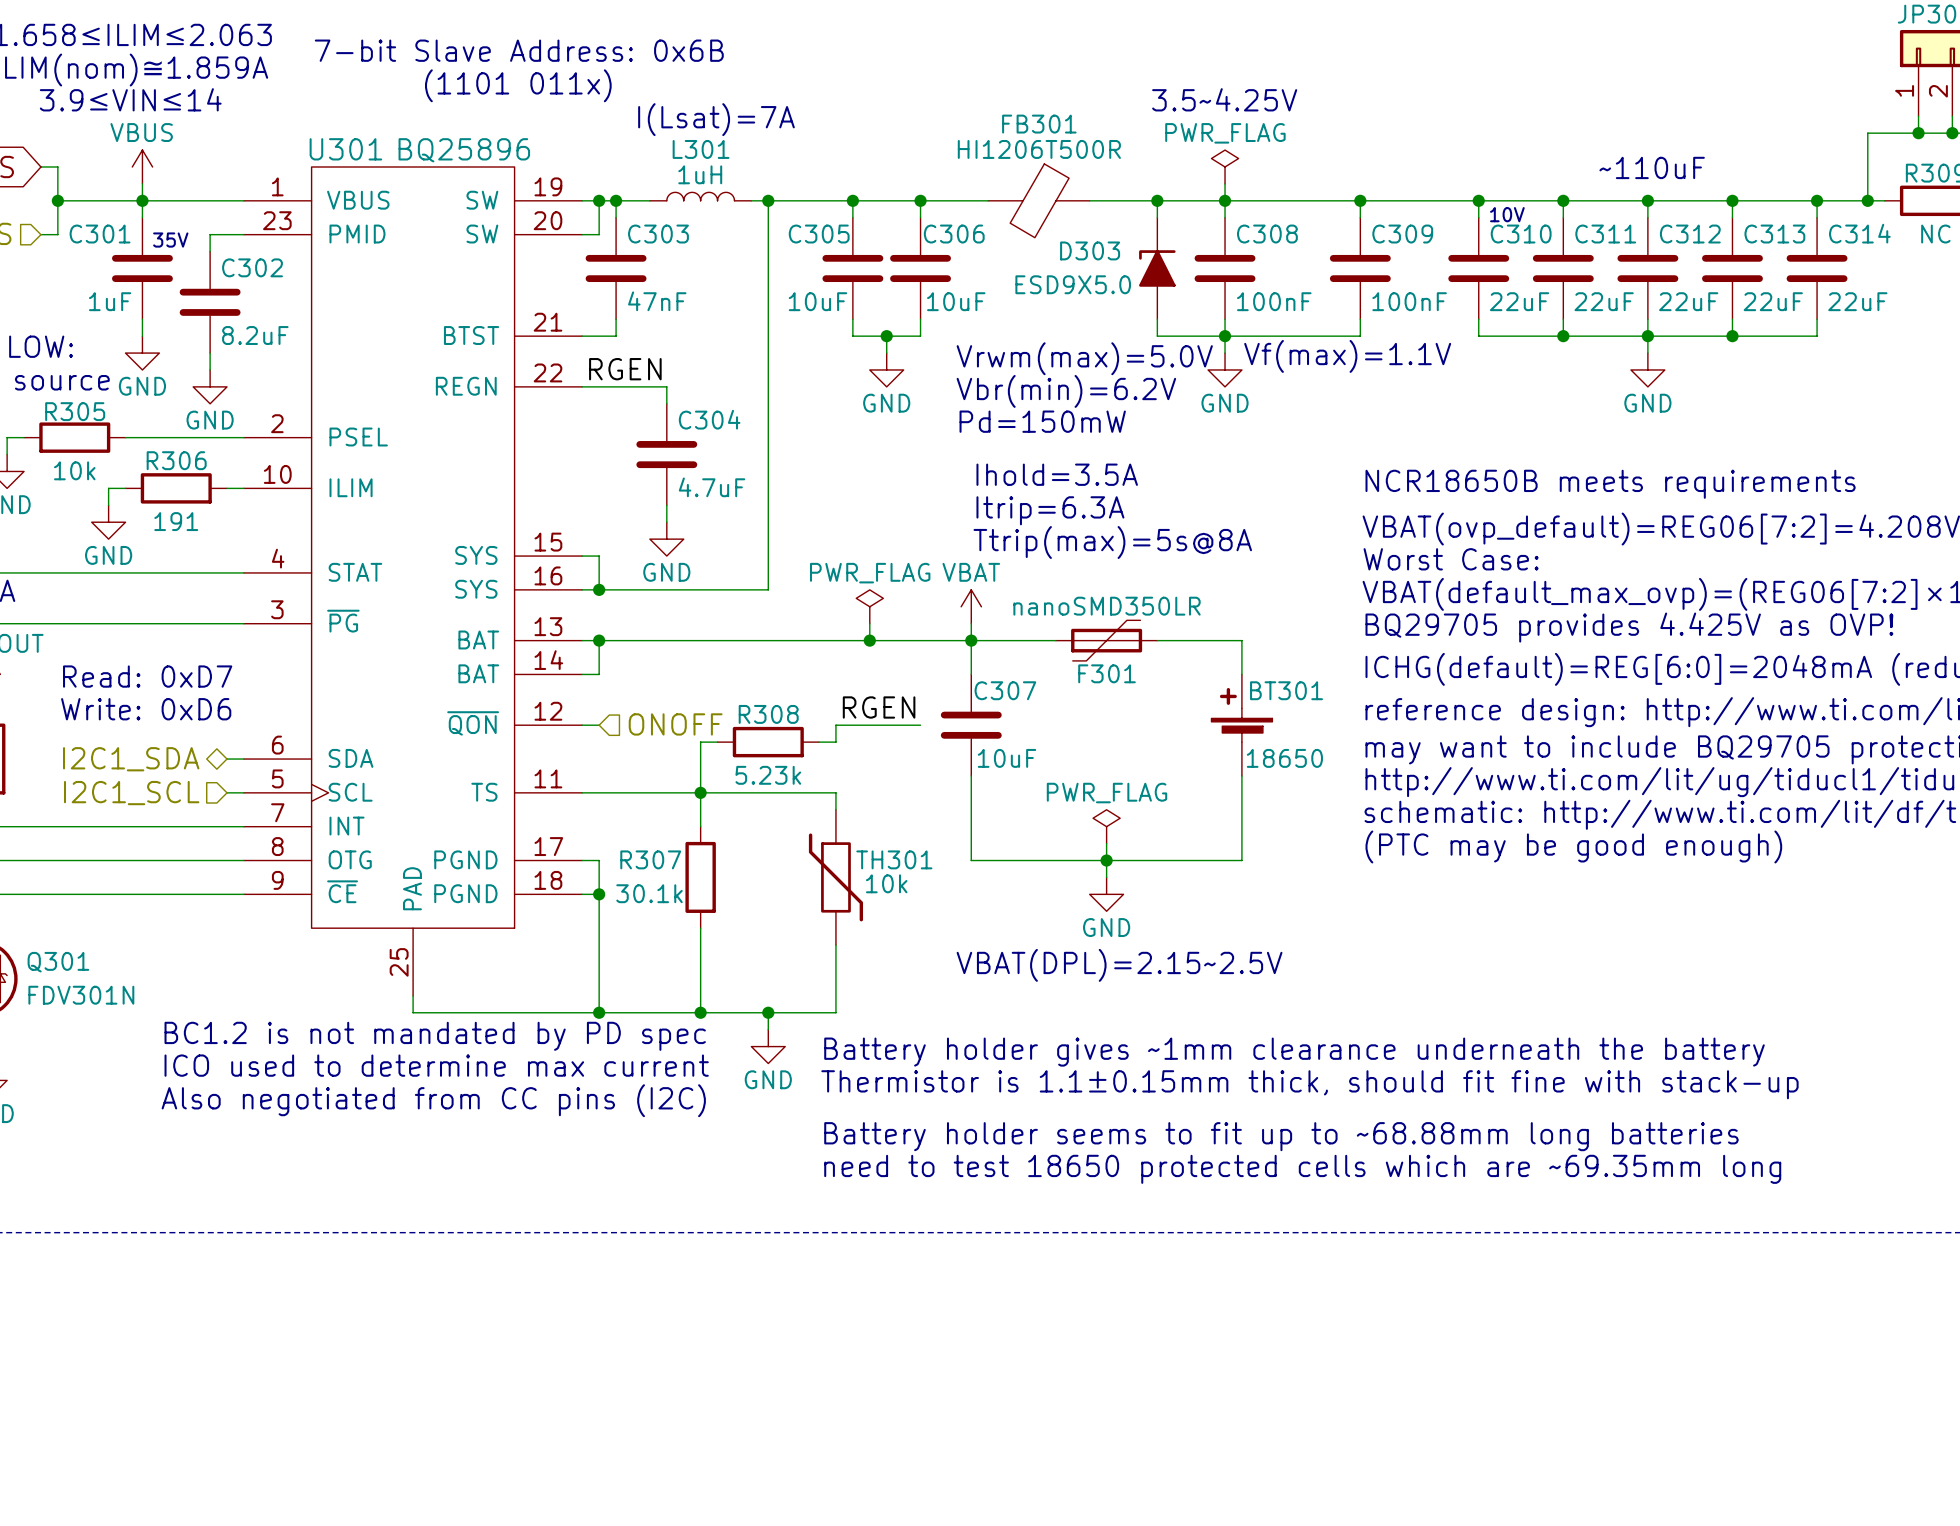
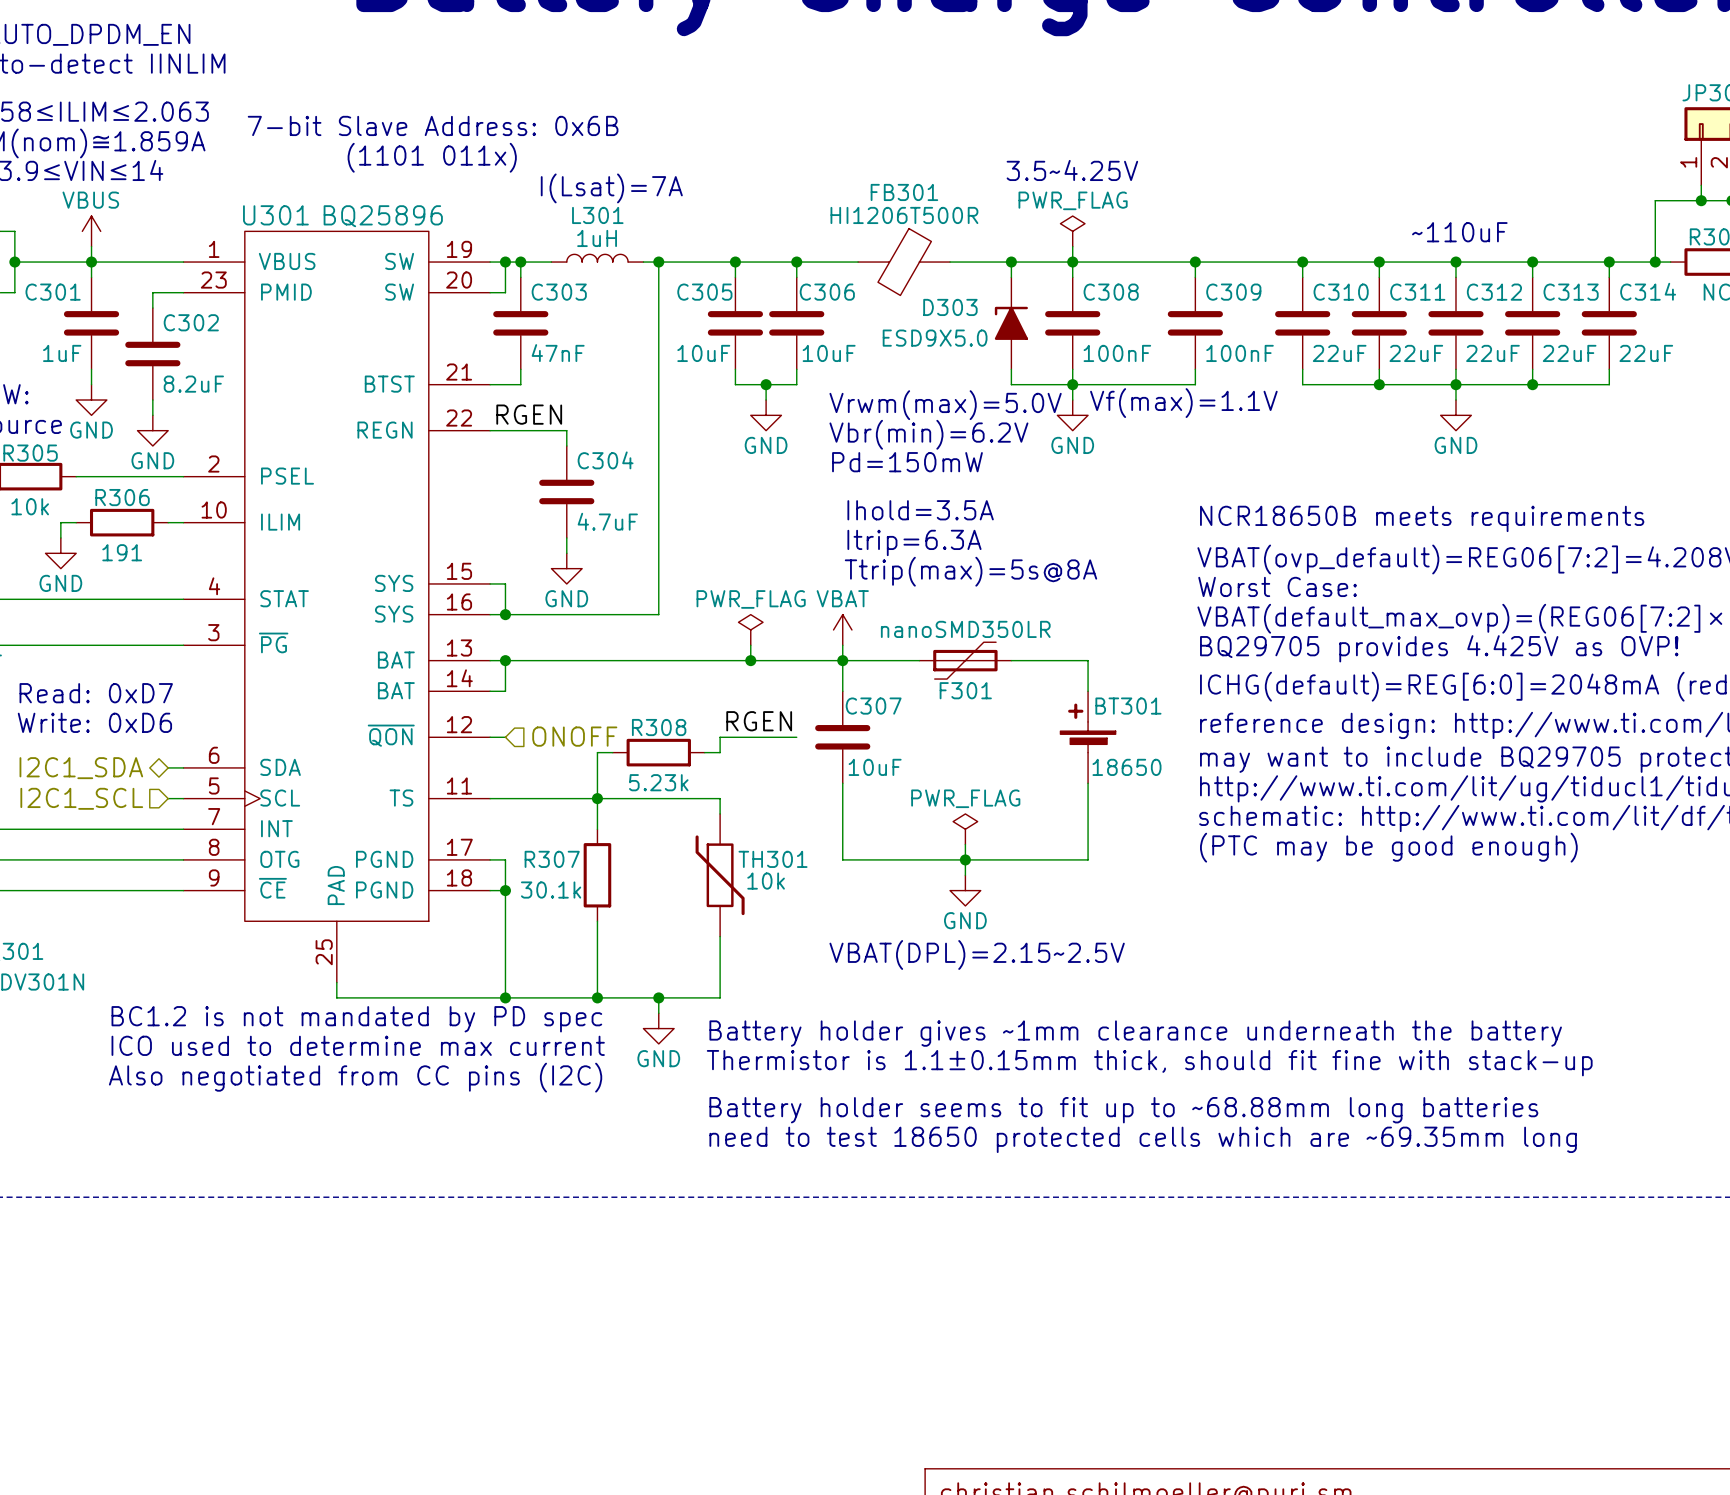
text: 10V (1507, 214) -> none
text: 35V (170, 240) -> none

